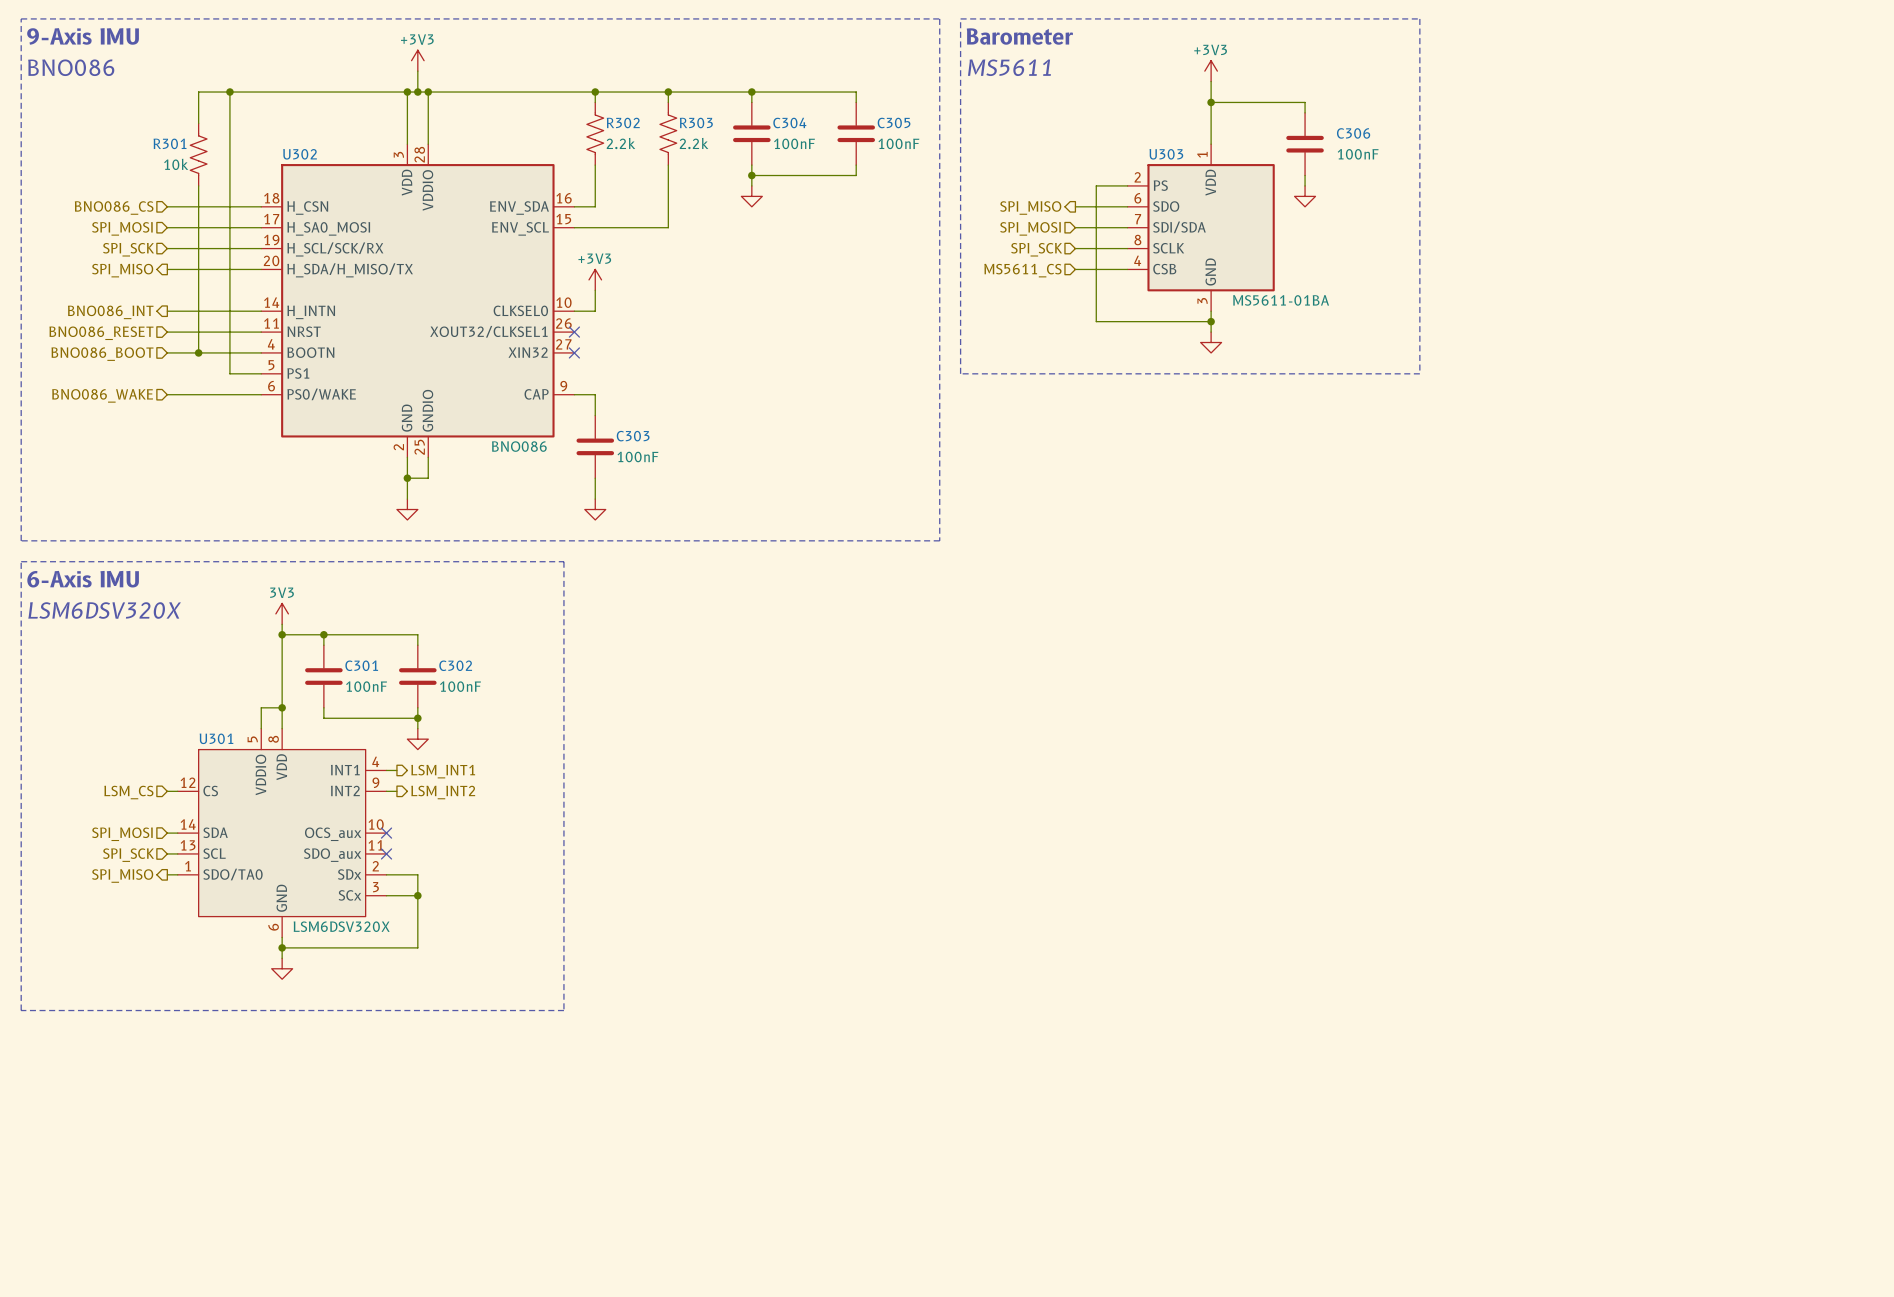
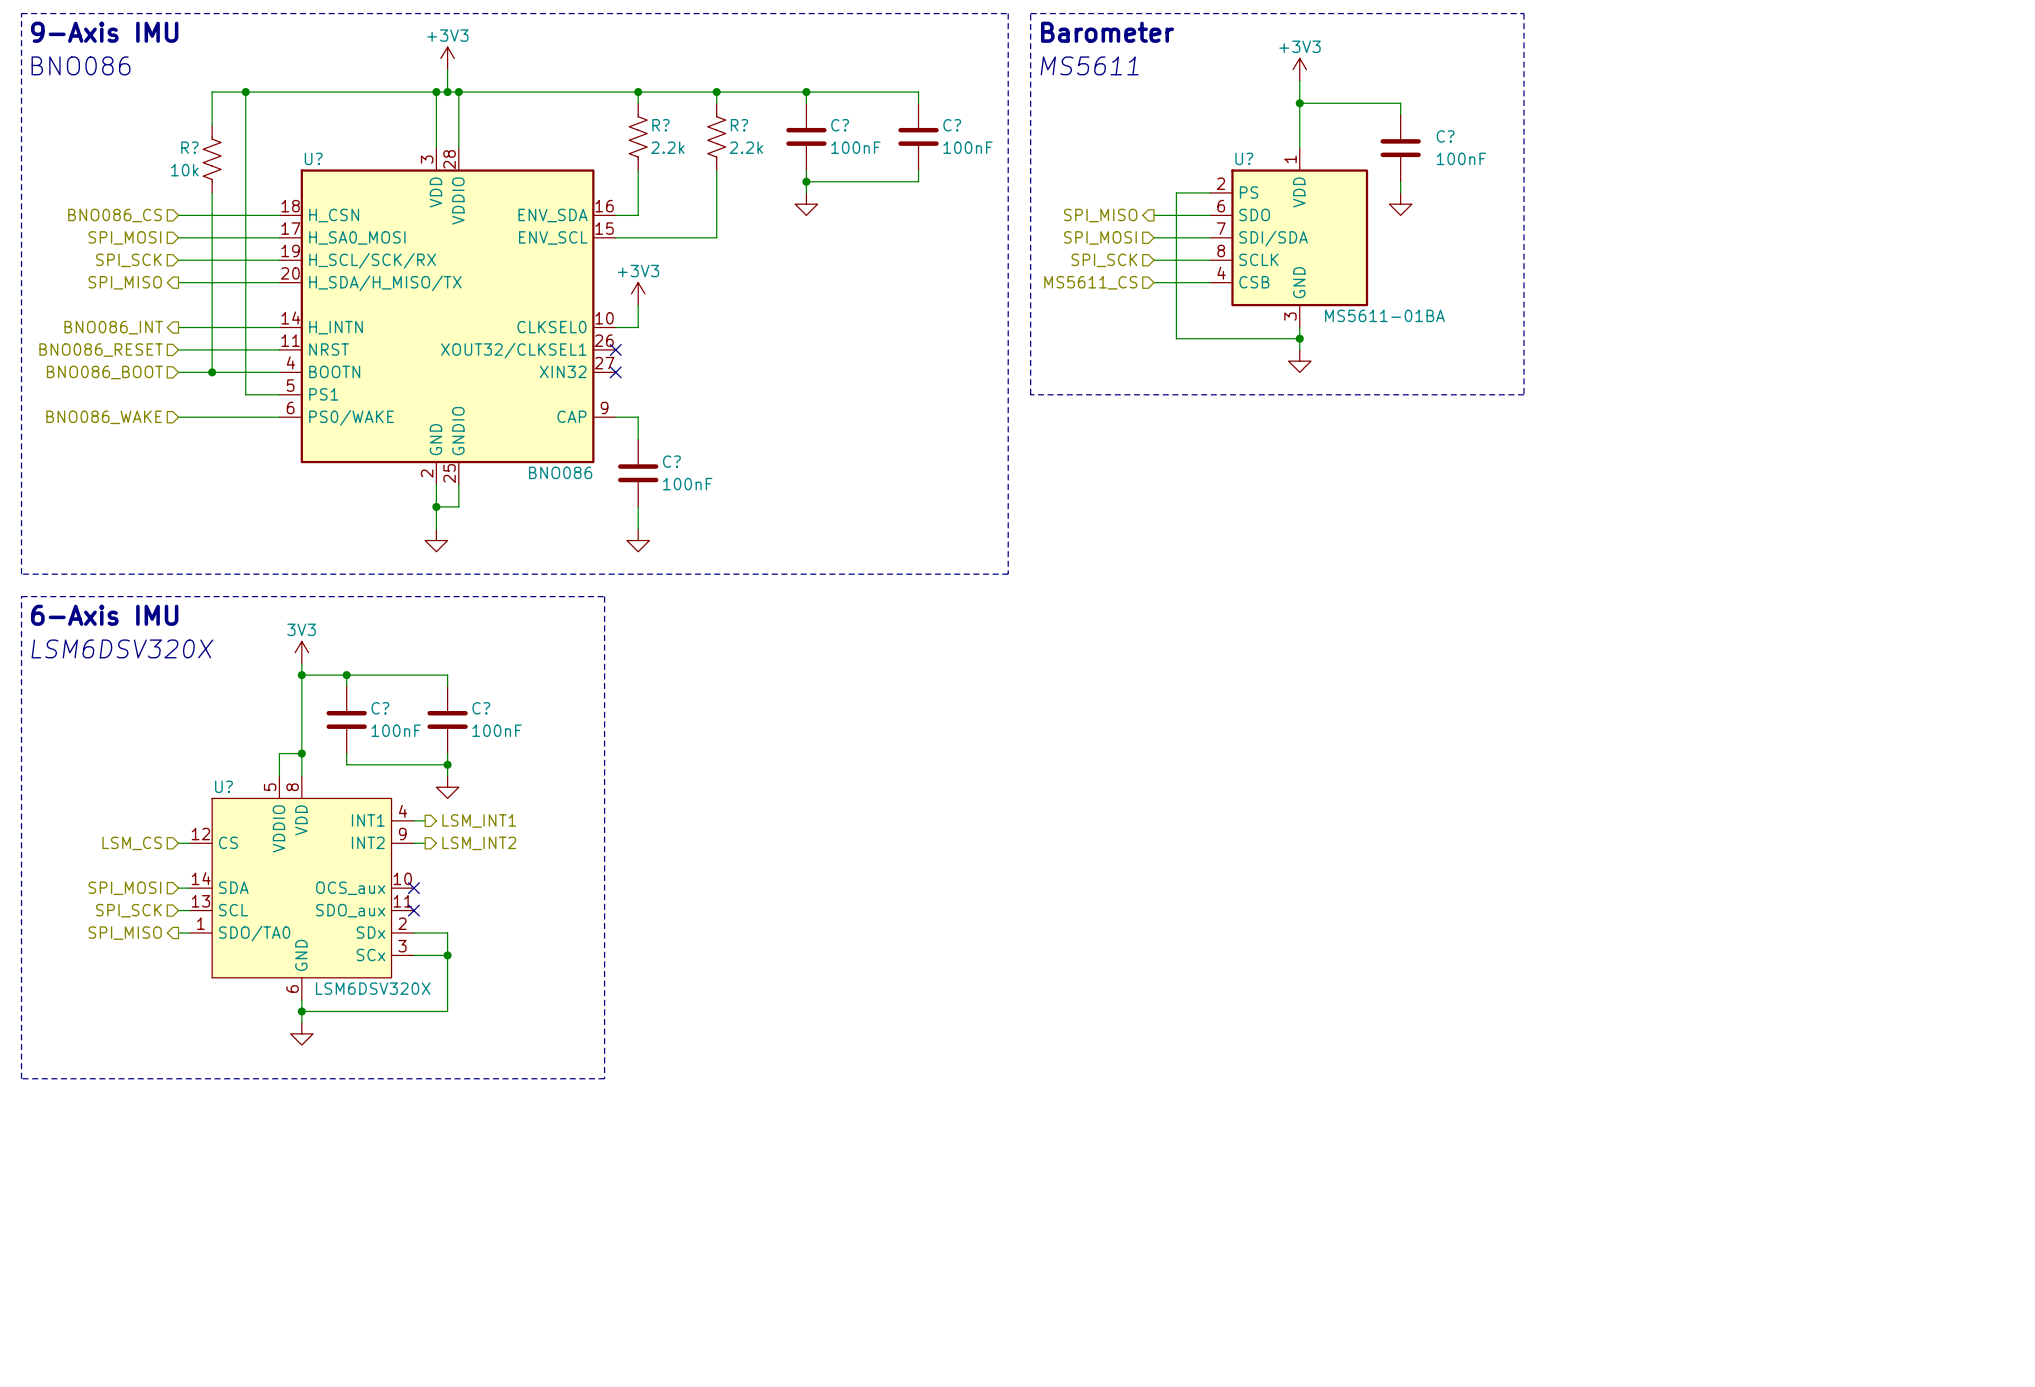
C304 name: C304 (789, 122) -> C? (840, 125)
R302 name: R302 (623, 123) -> R? (660, 125)
R303 name: R303 (696, 123) -> R? (739, 125)
C305 name: C305 (894, 123) -> C? (952, 125)
C306 name: C306 (1353, 133) -> C? (1445, 136)
R301 name: R301 (170, 143) -> R? (189, 147)
U302 name: U302 (300, 154) -> U? (313, 158)
U303 name: U303 (1166, 154) -> U? (1244, 158)
C303 name: C303 (633, 436) -> C? (671, 461)
C301 name: C301 (361, 665) -> C? (380, 708)
C302 name: C302 (455, 665) -> C? (481, 708)
U301 name: U301 (216, 738) -> U? (223, 786)

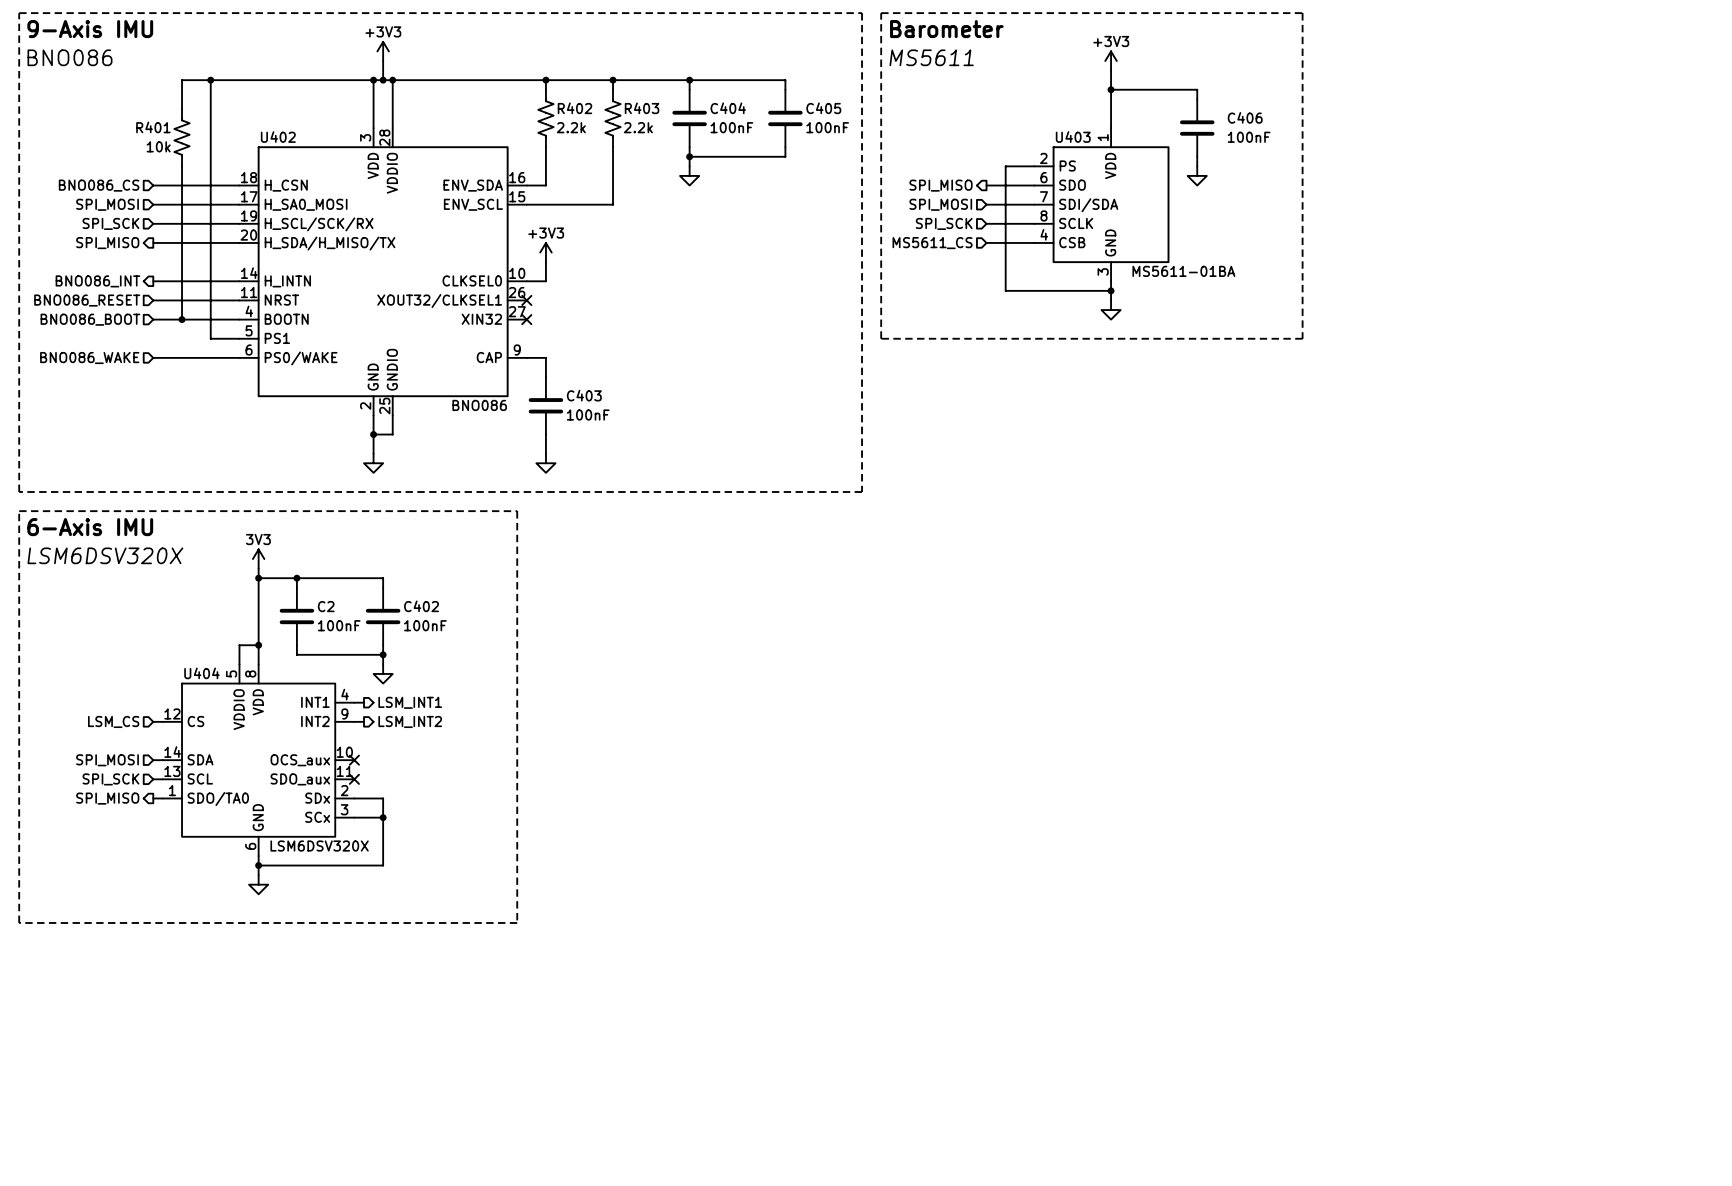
R? name: R? (660, 125) -> R402 (574, 108)
R? name: R? (739, 125) -> R403 (642, 108)
C? name: C? (840, 125) -> C404 (728, 108)
C? name: C? (952, 125) -> C405 (823, 108)
C? name: C? (1445, 136) -> C406 (1245, 117)
R? name: R? (189, 147) -> R401 (153, 127)
U? name: U? (313, 158) -> U402 (278, 137)
U? name: U? (1244, 158) -> U403 (1073, 137)
C? name: C? (671, 461) -> C403 (584, 395)
C? name: C? (380, 708) -> C2 (326, 606)
C? name: C? (481, 708) -> C402 (421, 606)
U? name: U? (223, 786) -> U404 (201, 673)

